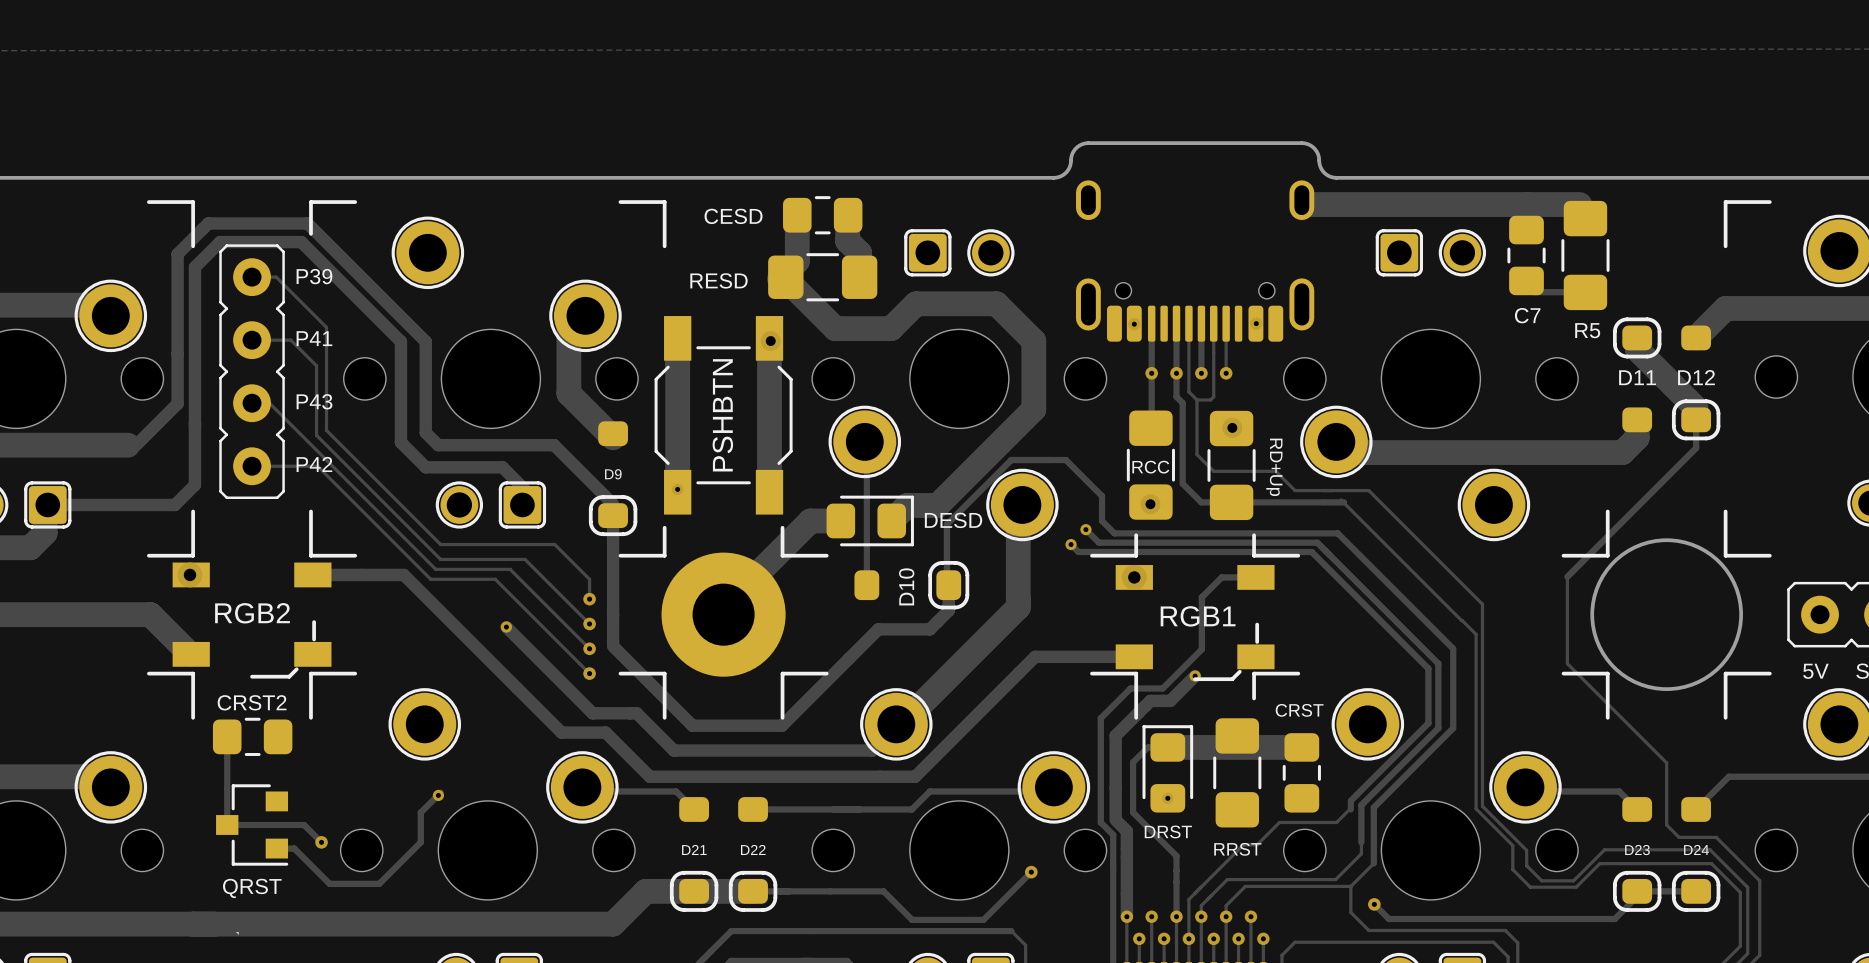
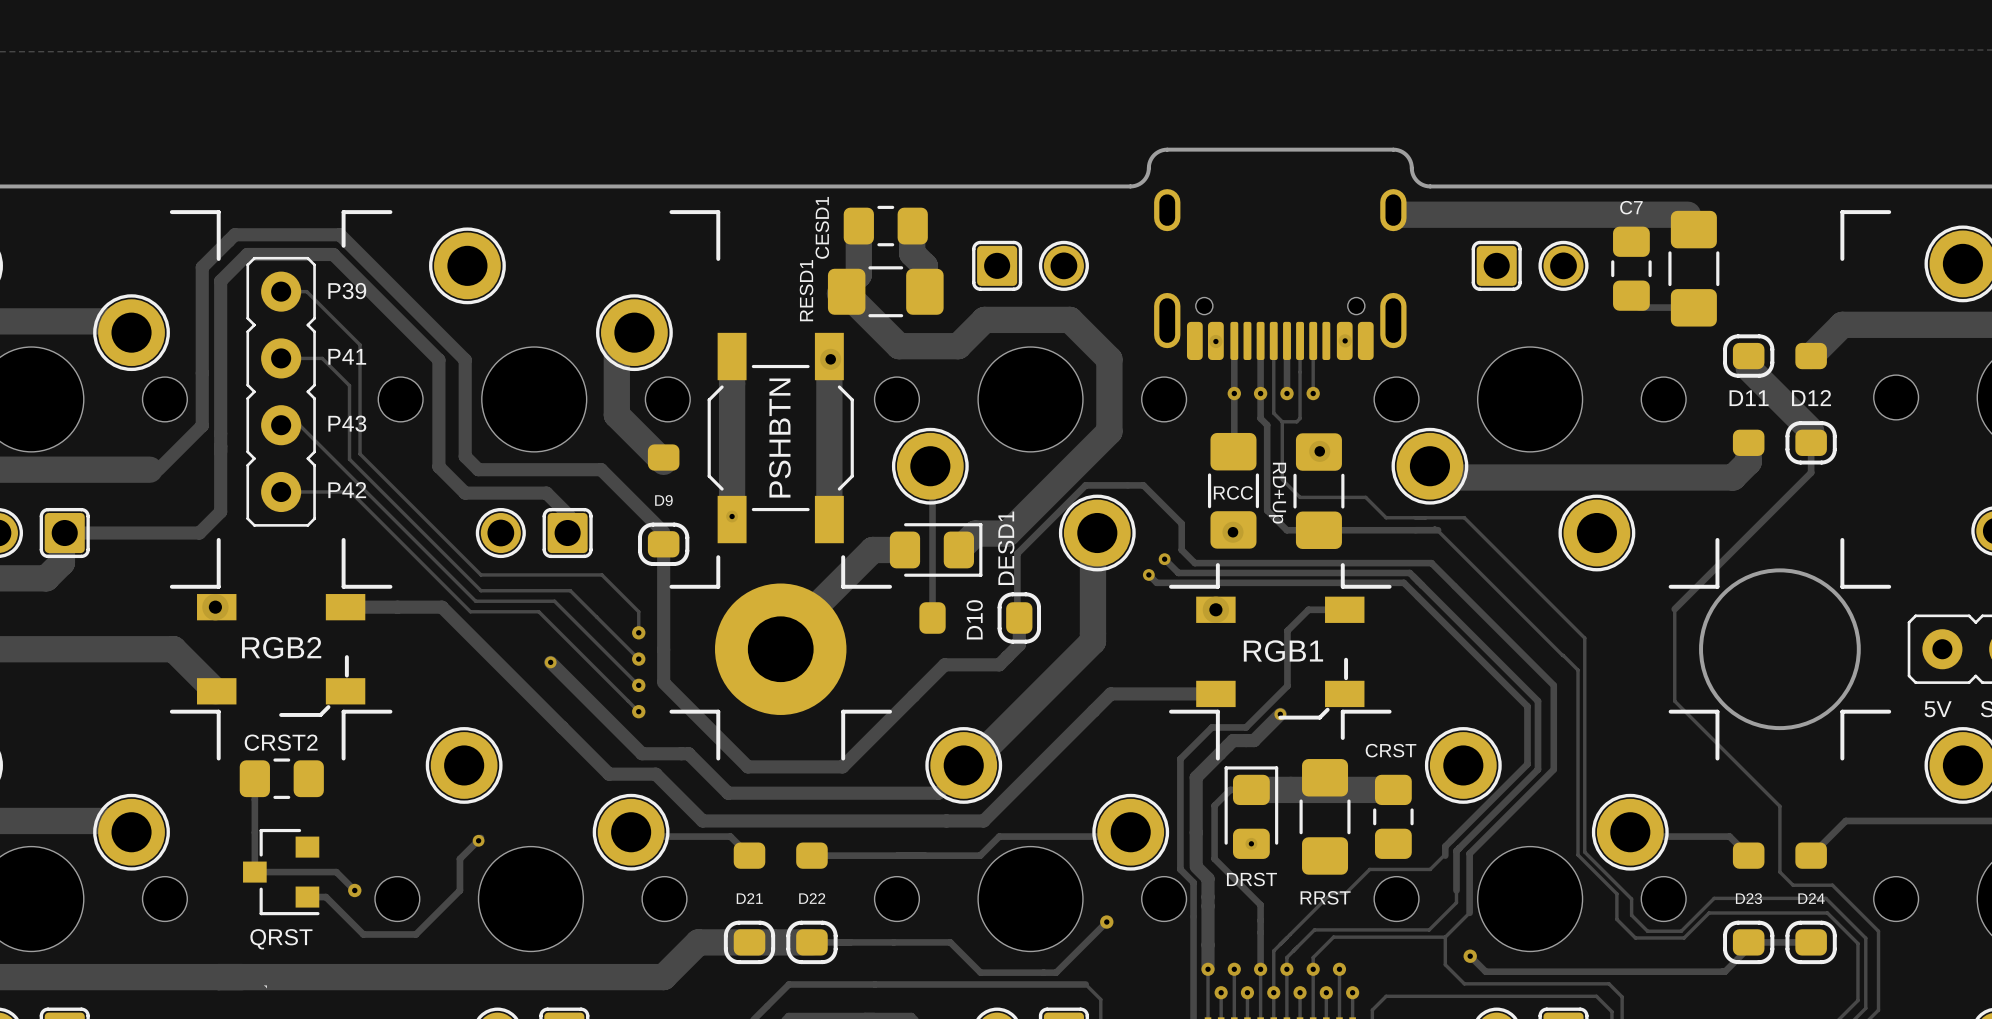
CESD name: CESD (733, 216) -> CESD1 (822, 227)
RESD name: RESD (718, 280) -> RESD1 (806, 290)
C7 name position: C7 (1527, 315) -> C7 (1631, 207)
R5 name: R5 (1587, 330) -> none
text position: RD+Up (1274, 467) -> RD+Up (1277, 493)
DESD name: DESD (953, 520) -> DESD1 (1006, 548)

